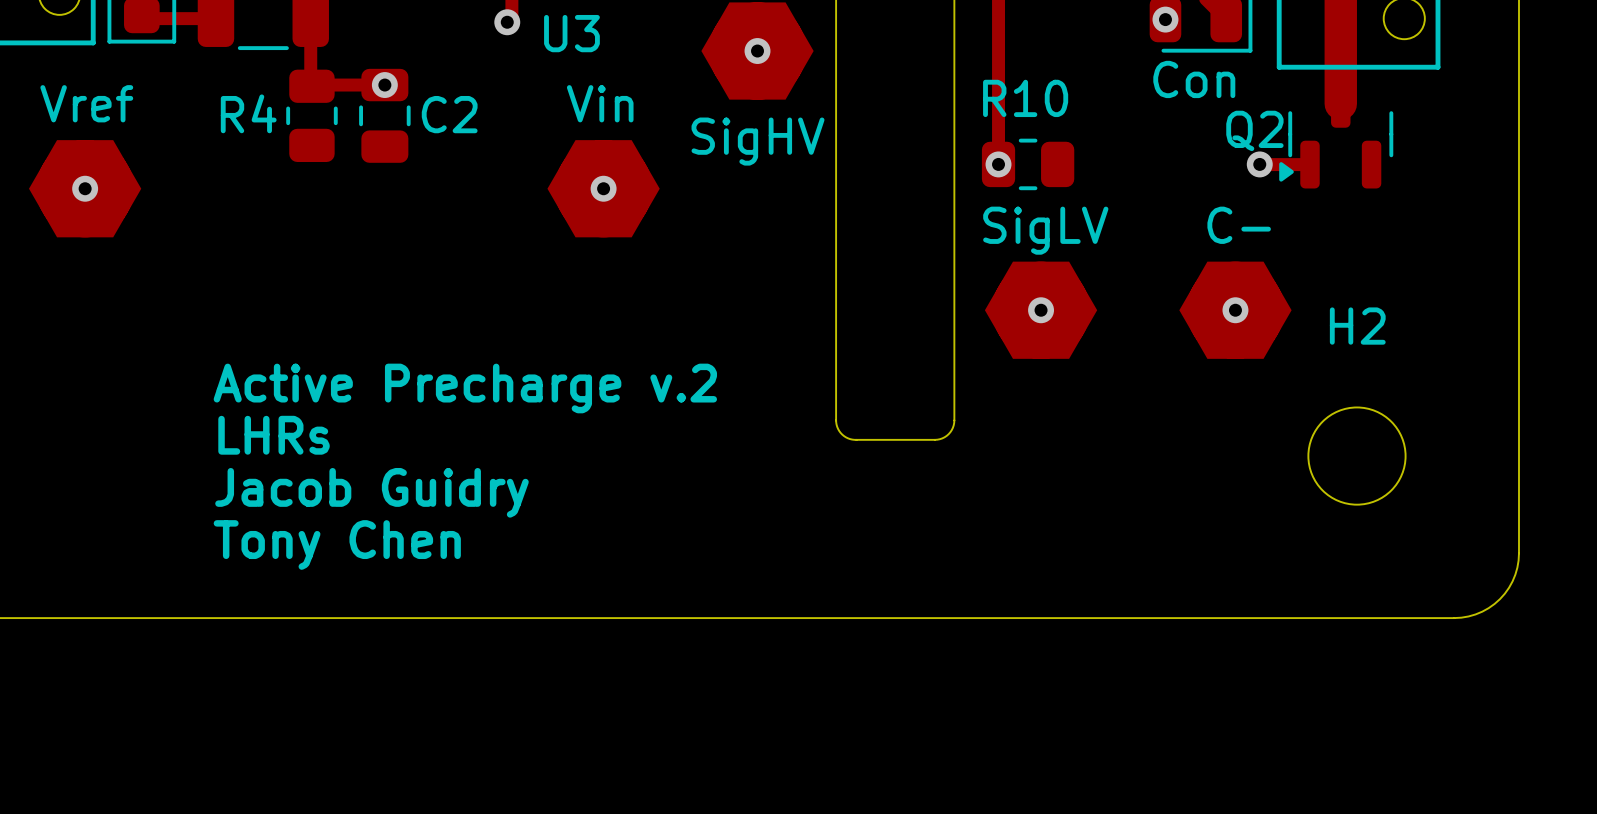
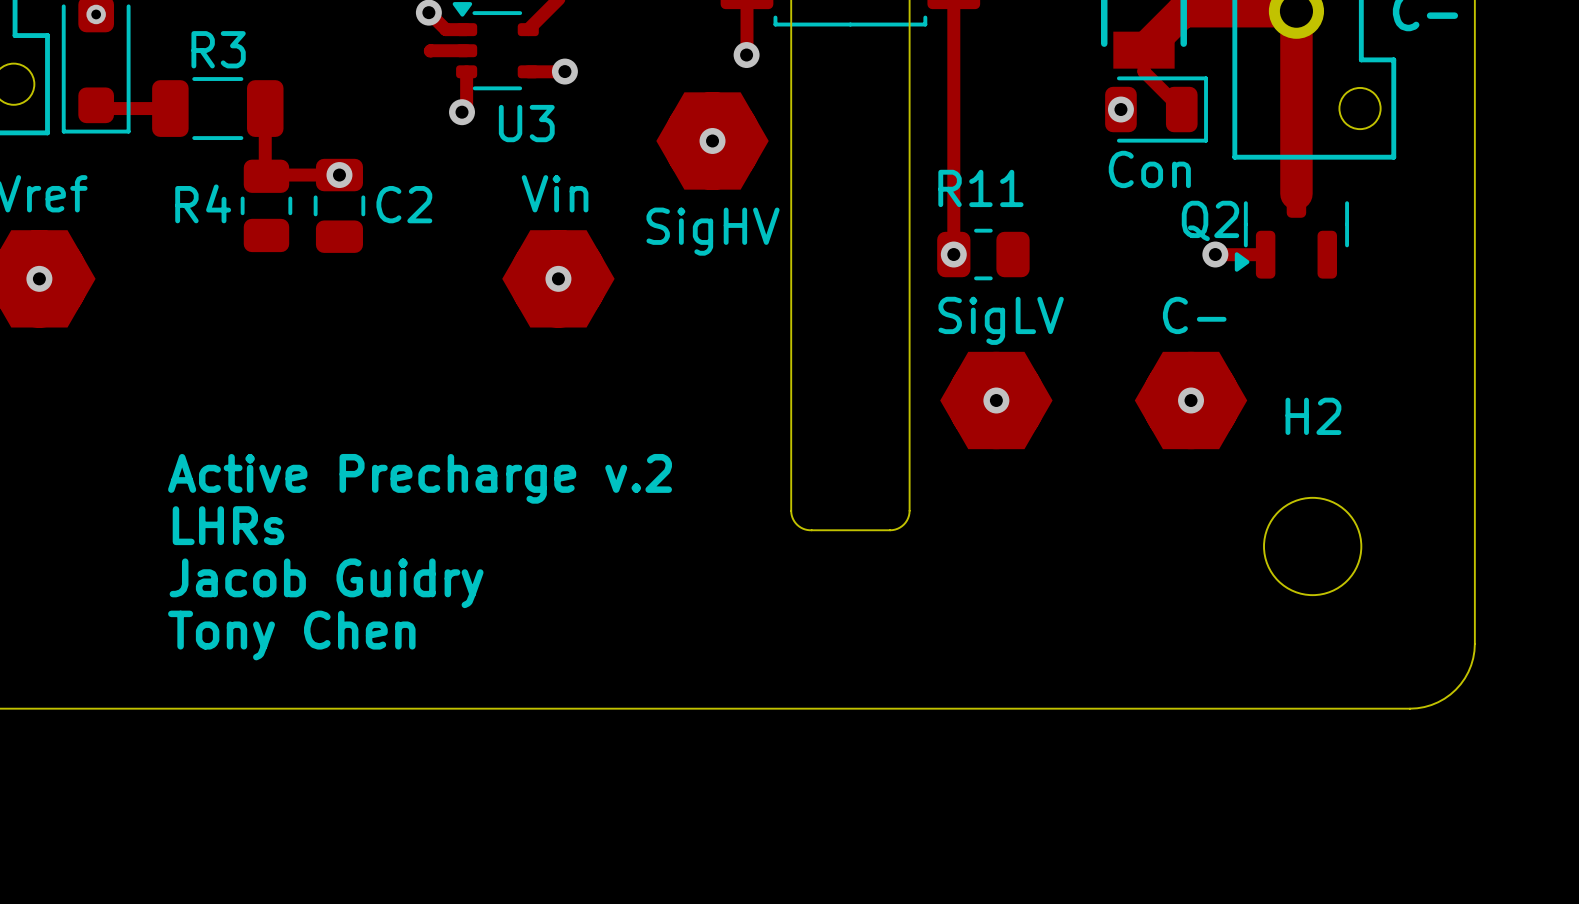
R10 name: R10 (1025, 98) -> R11 (980, 188)

